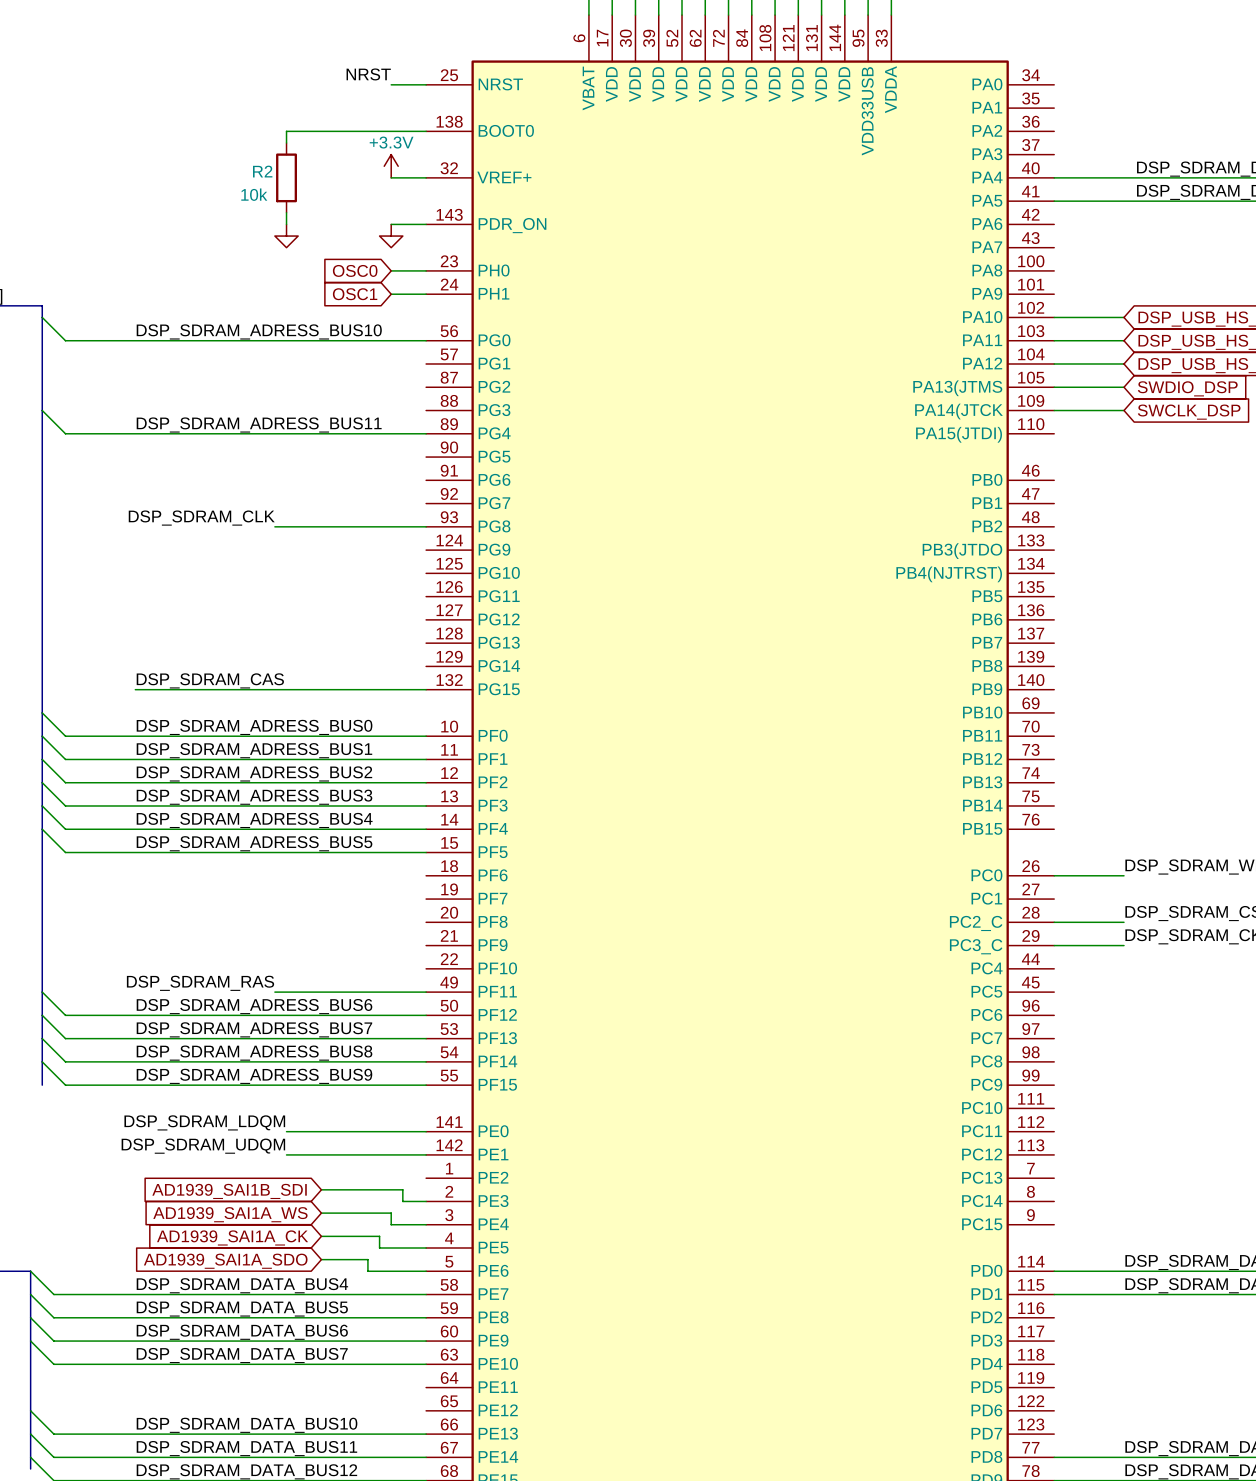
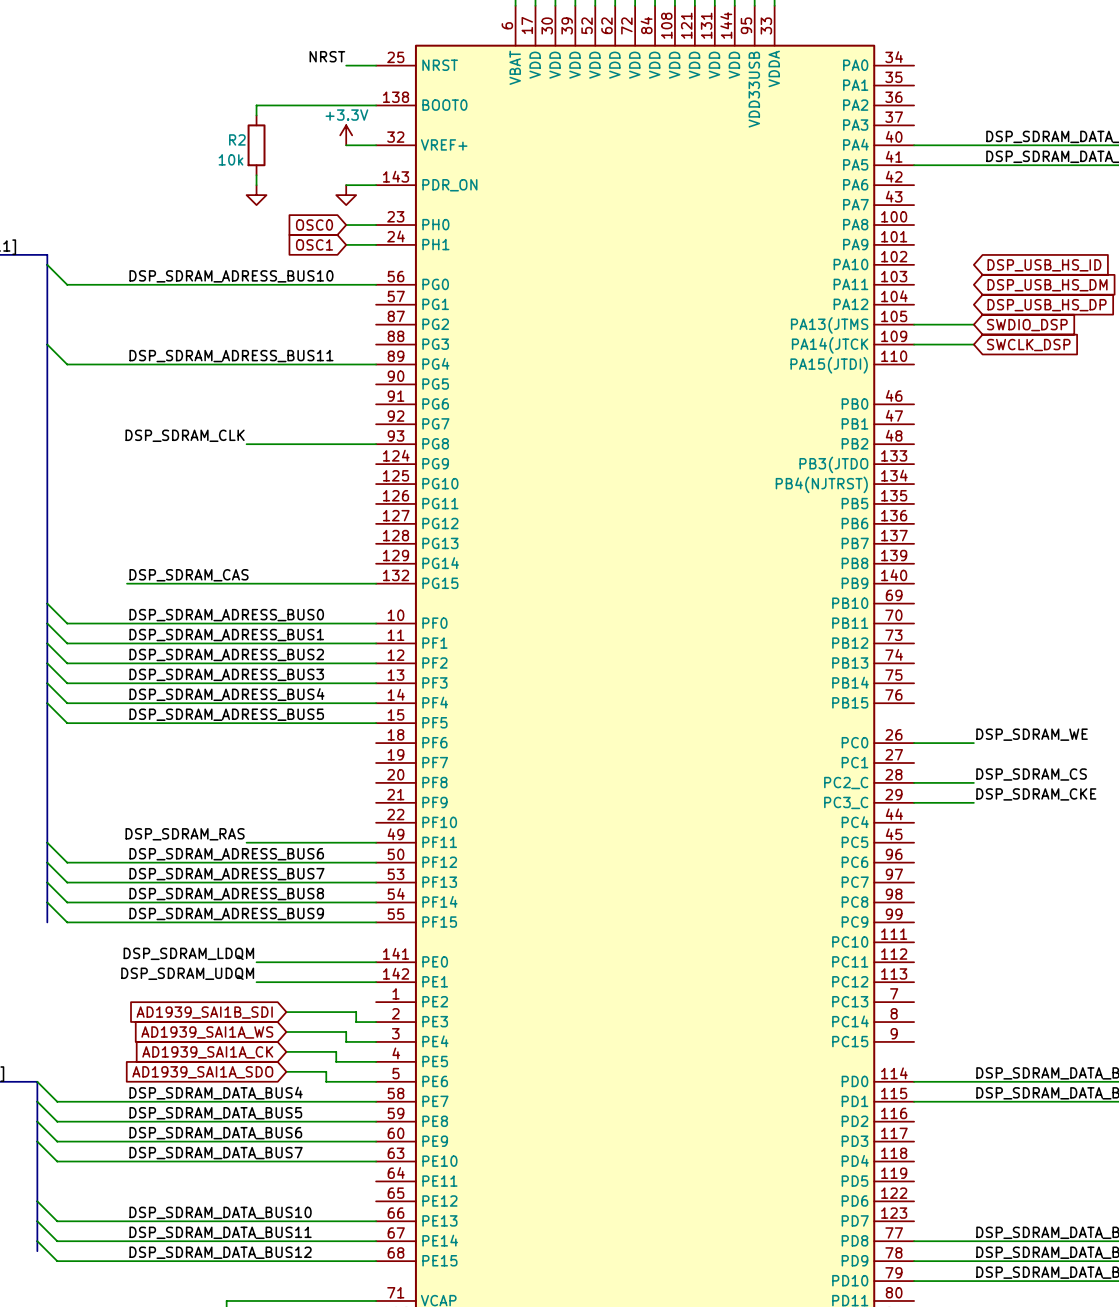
wire: (1054, 317) (1124, 317) -> none
wire: (1054, 340) (1124, 340) -> none
wire: (1054, 363) (1124, 363) -> none

